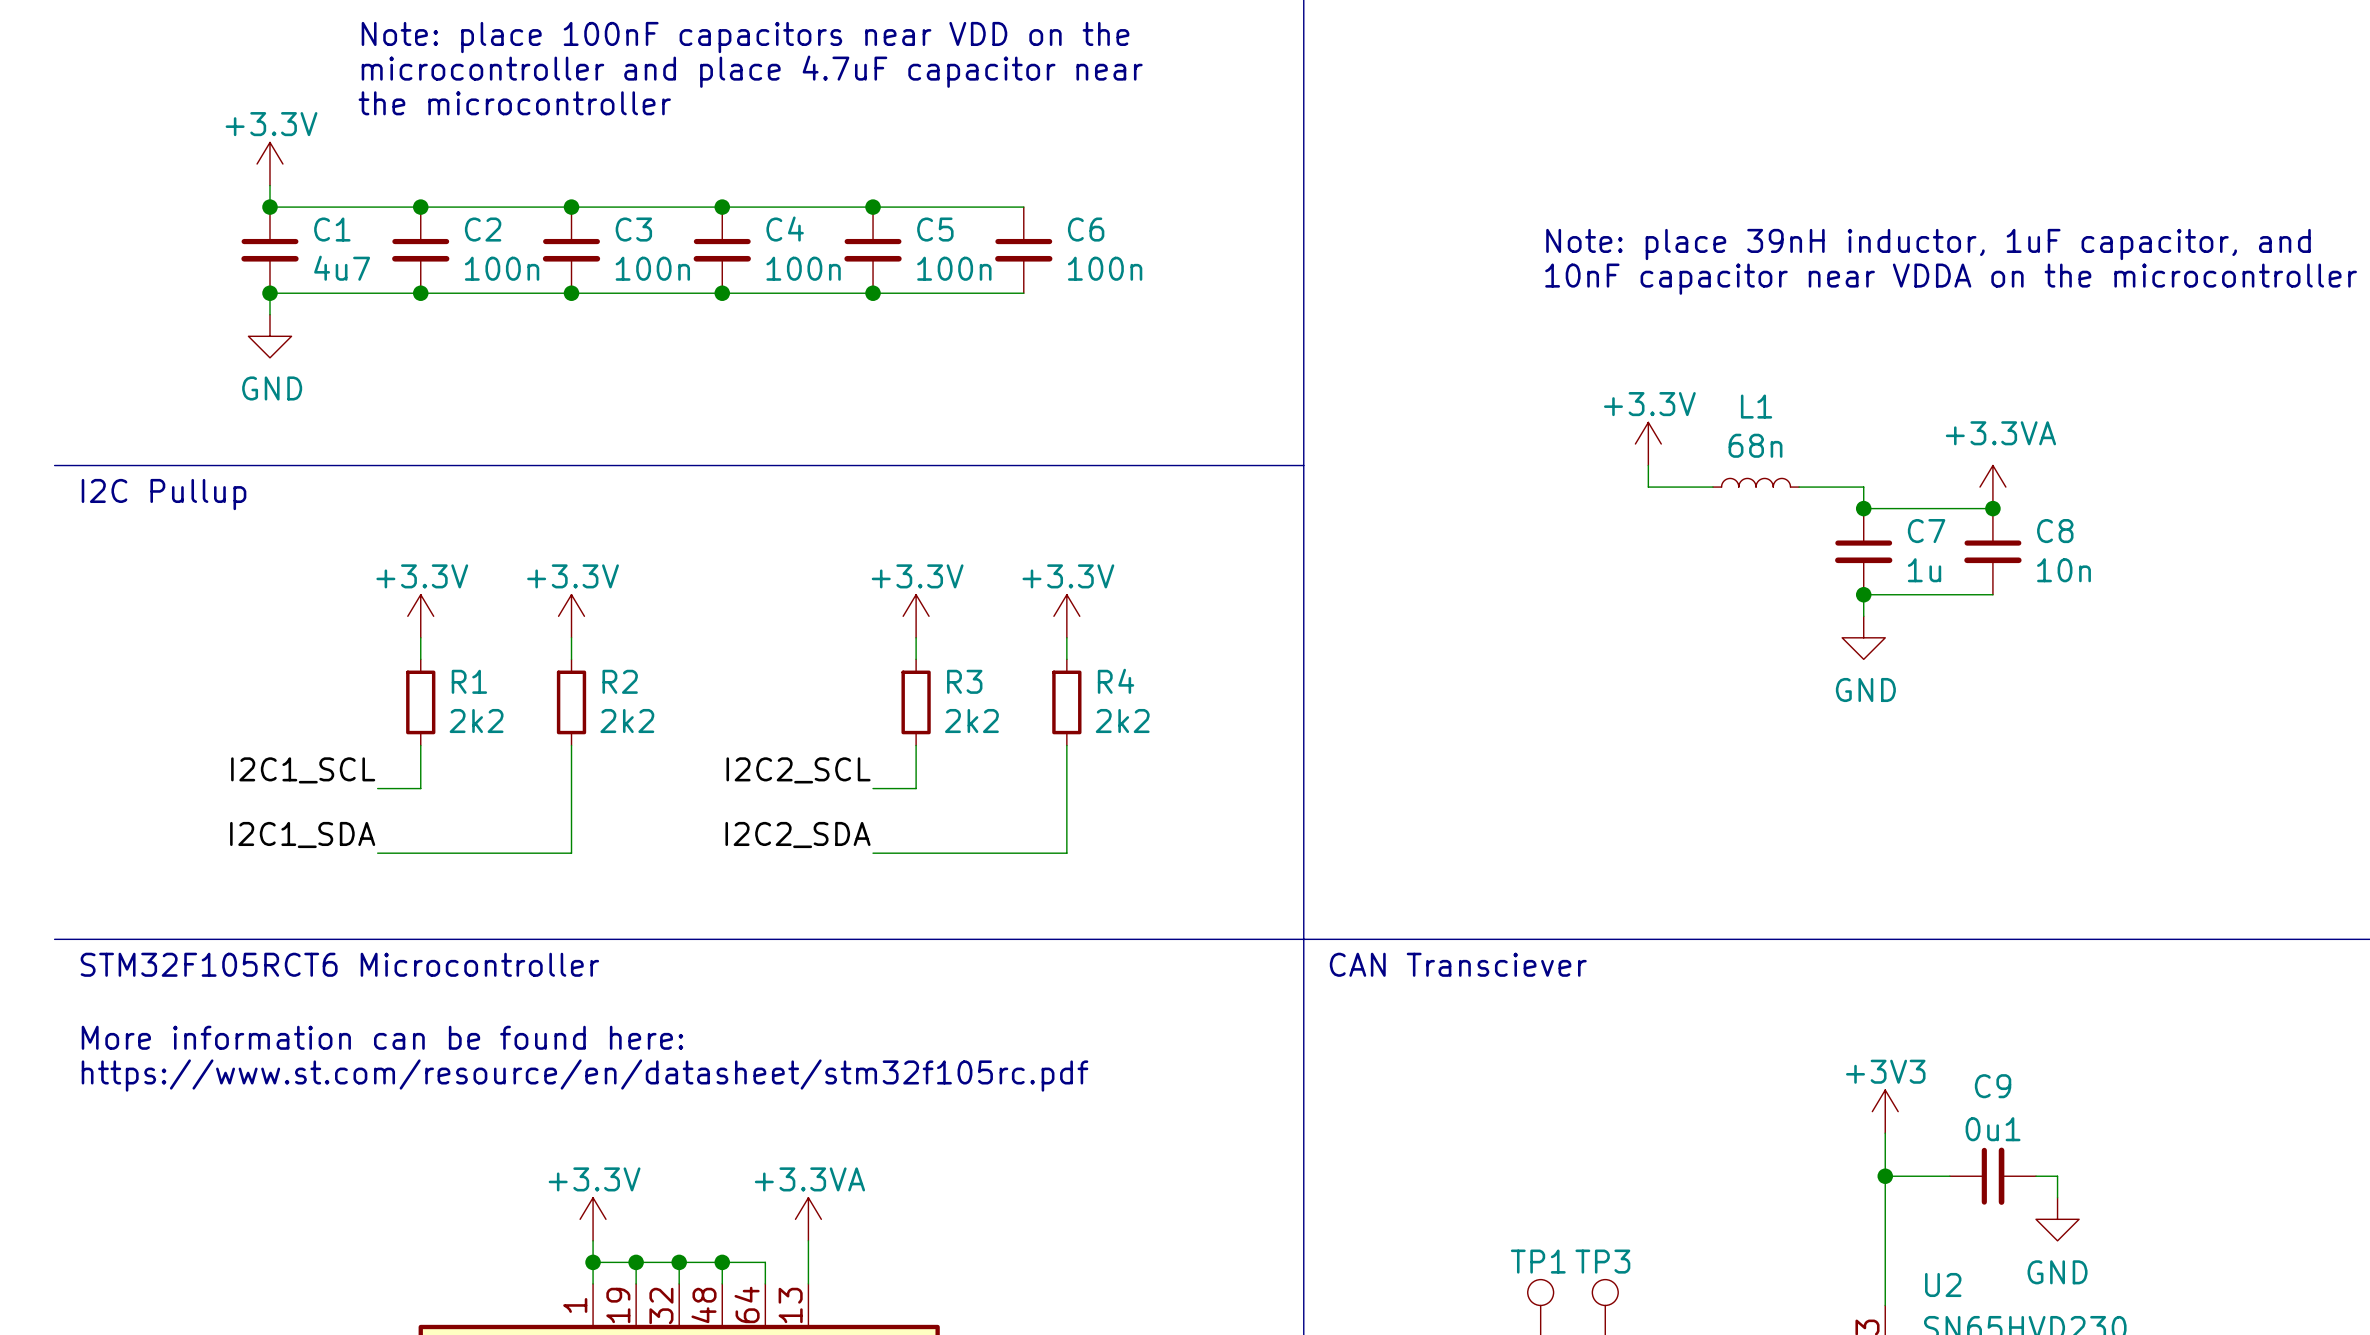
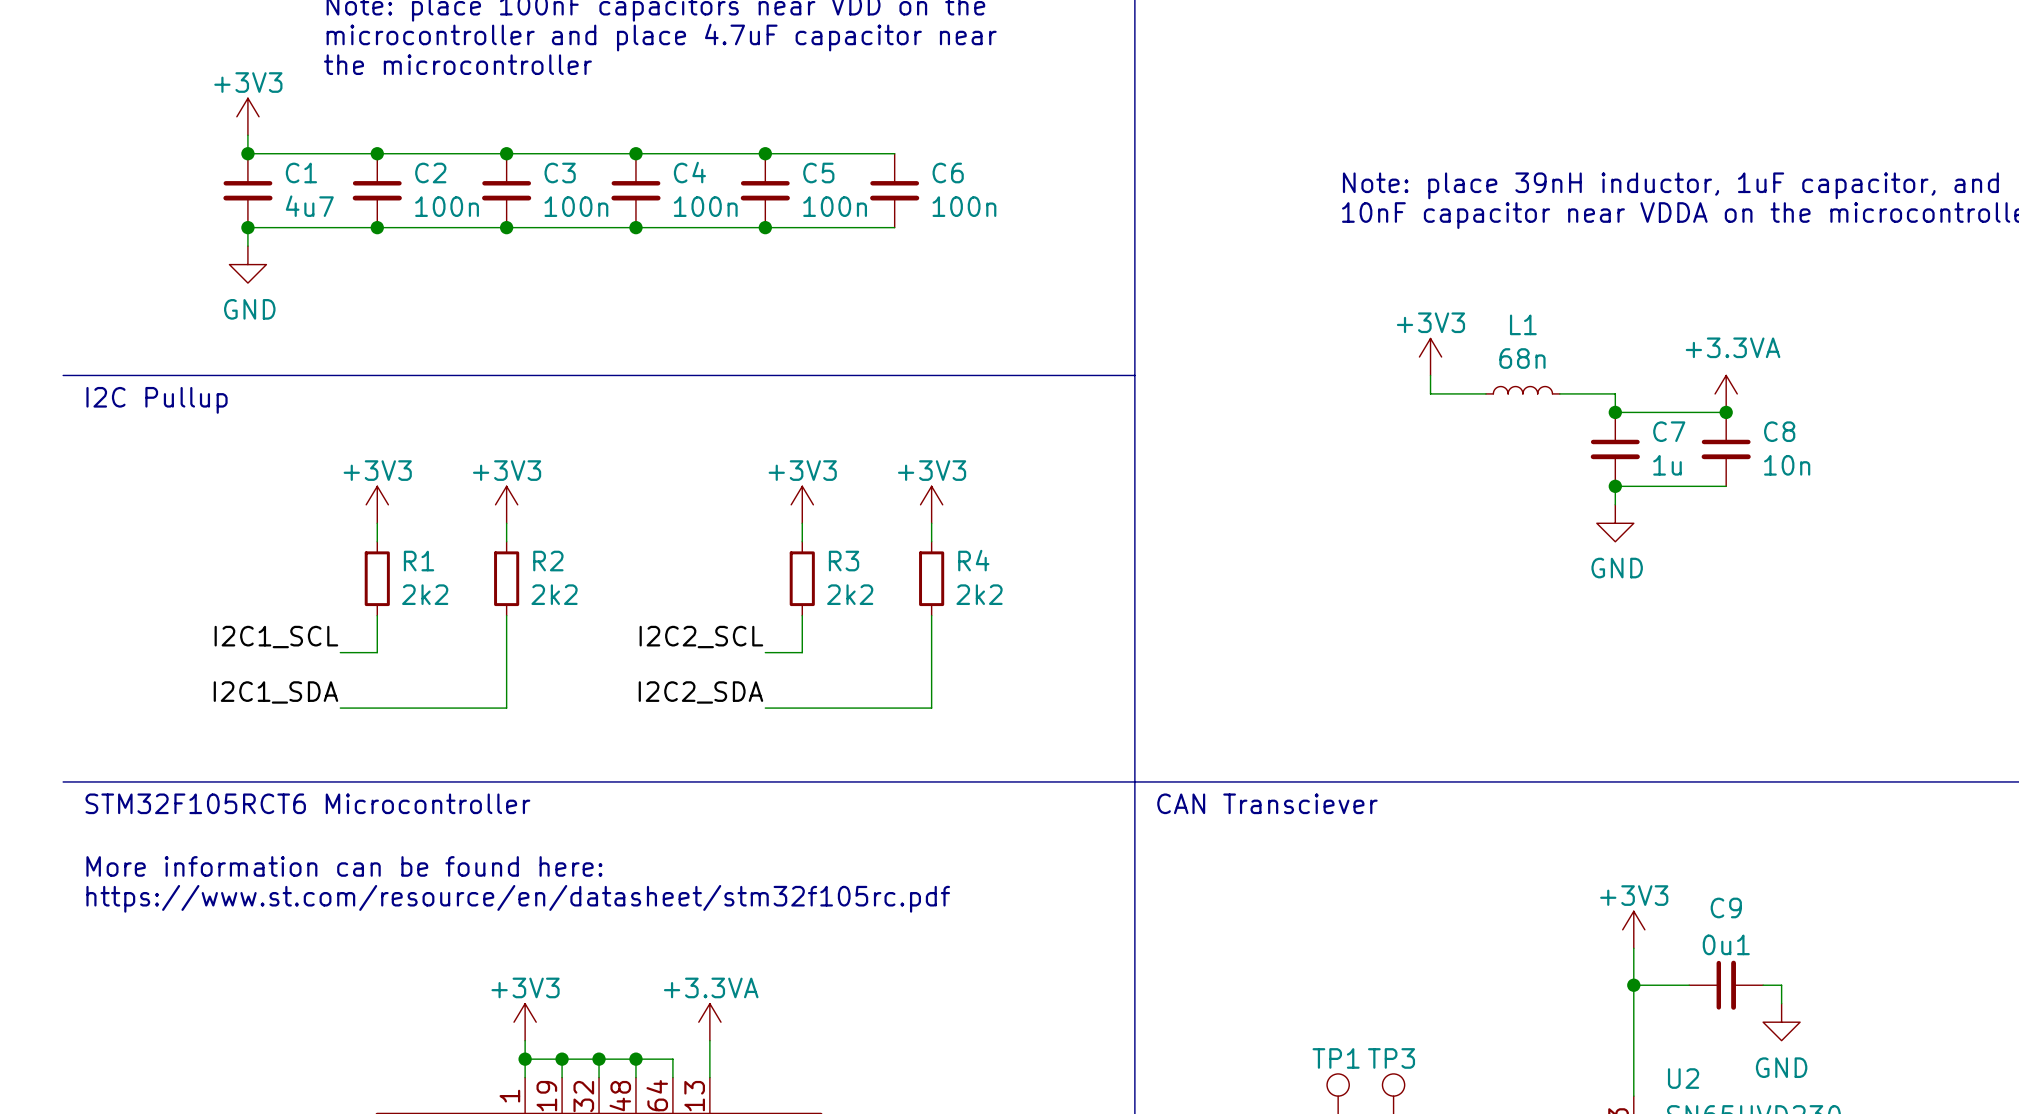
power symbol: +3.3V (269, 164) -> +3V3 (247, 116)
power symbol: +3.3V (1648, 443) -> +3V3 (1430, 356)
power symbol: +3.3V (420, 616) -> +3V3 (377, 504)
power symbol: +3.3V (571, 616) -> +3V3 (506, 504)
power symbol: +3.3V (916, 616) -> +3V3 (802, 504)
power symbol: +3.3V (1066, 616) -> +3V3 (931, 504)
power symbol: +3.3V (593, 1219) -> +3V3 (525, 1022)

